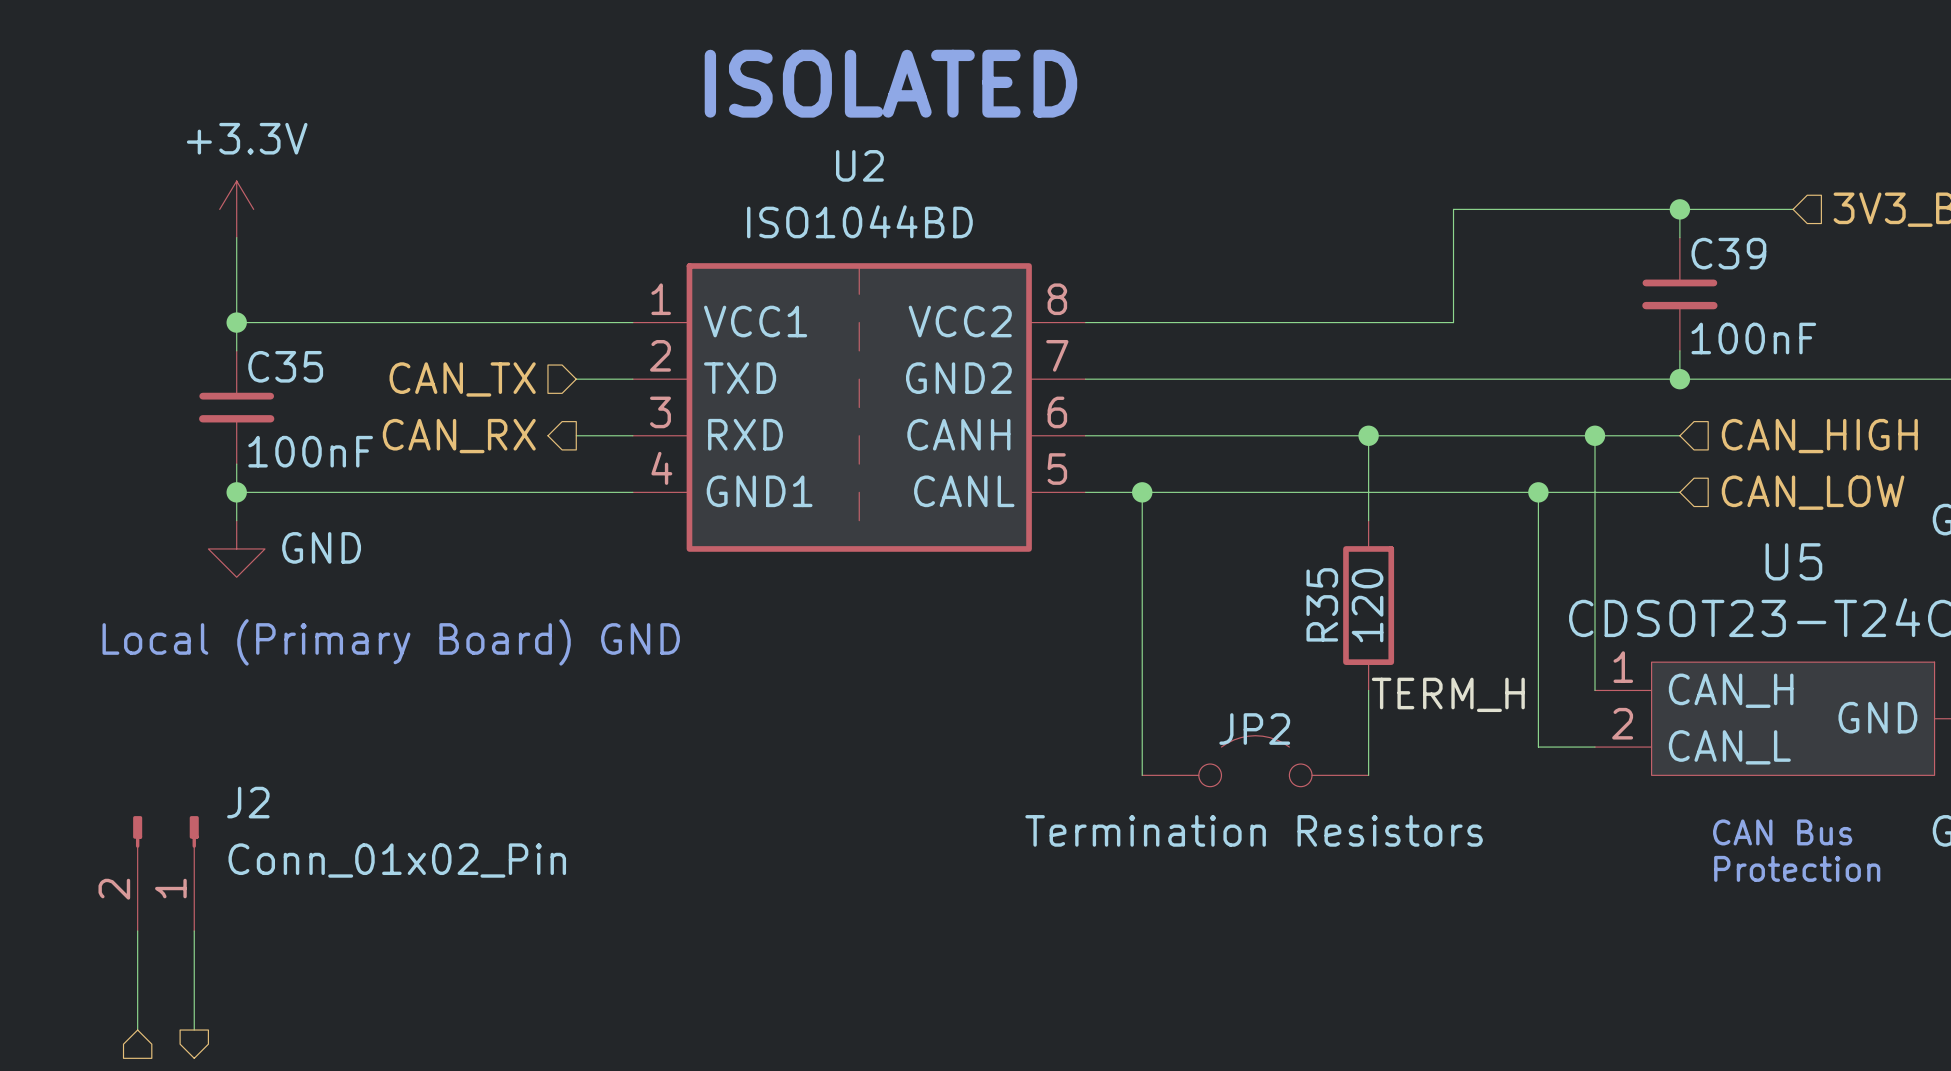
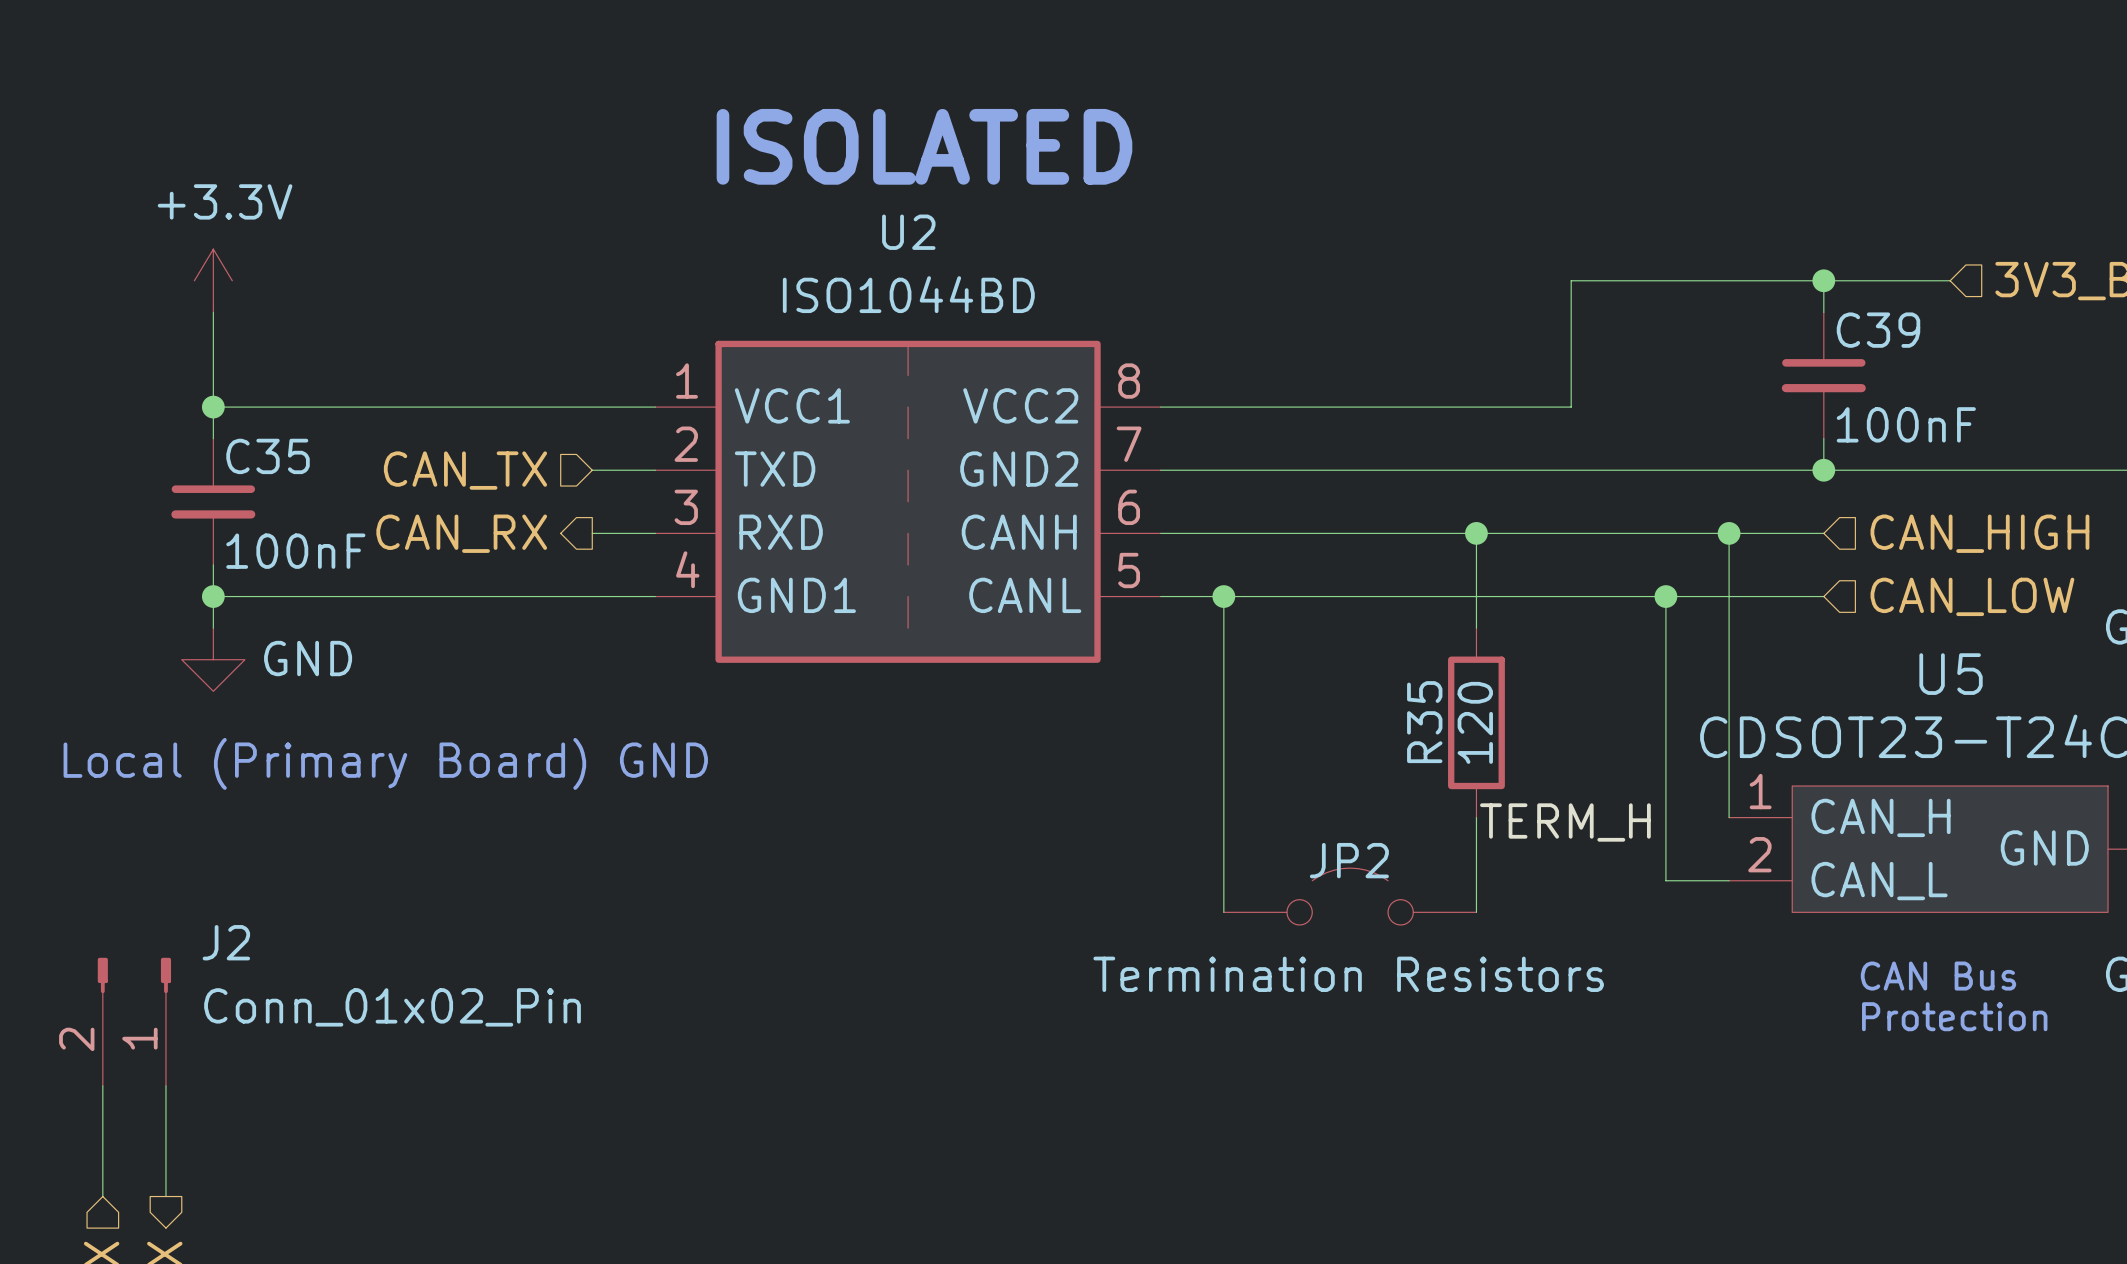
text position: ISOLATED (890, 83) -> ISOLATED (924, 146)

